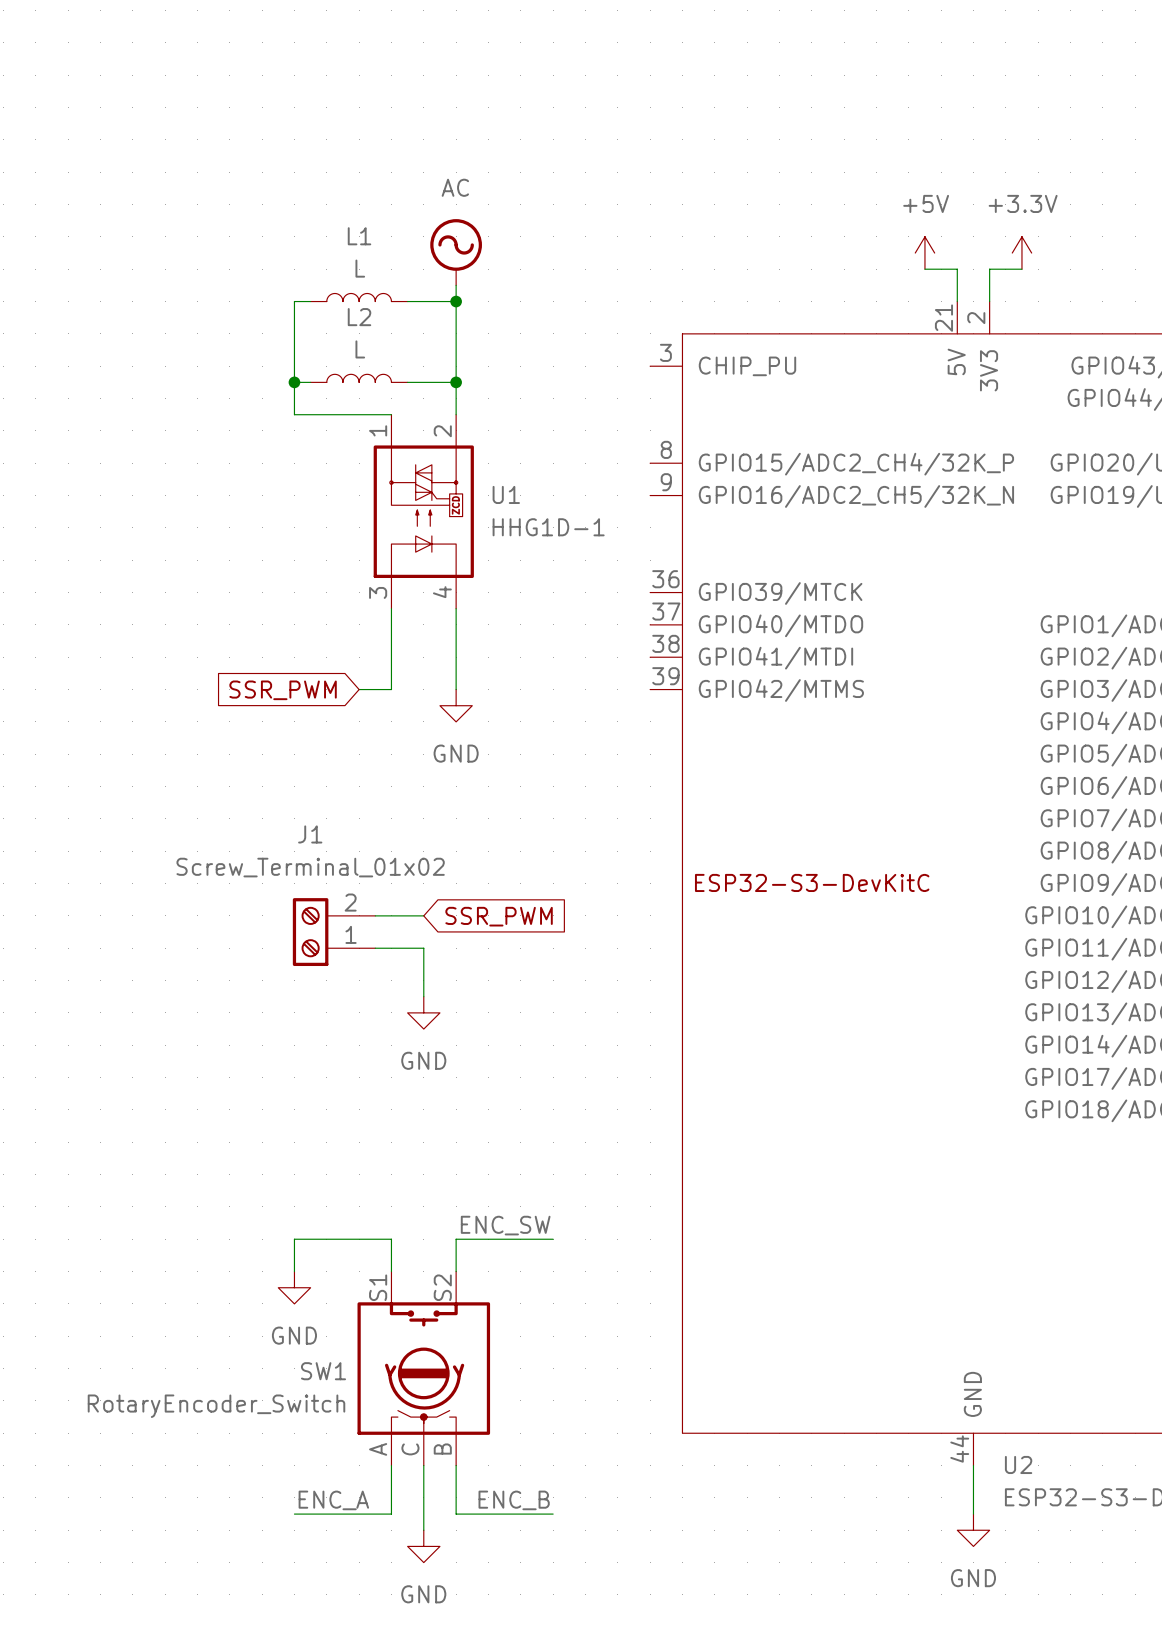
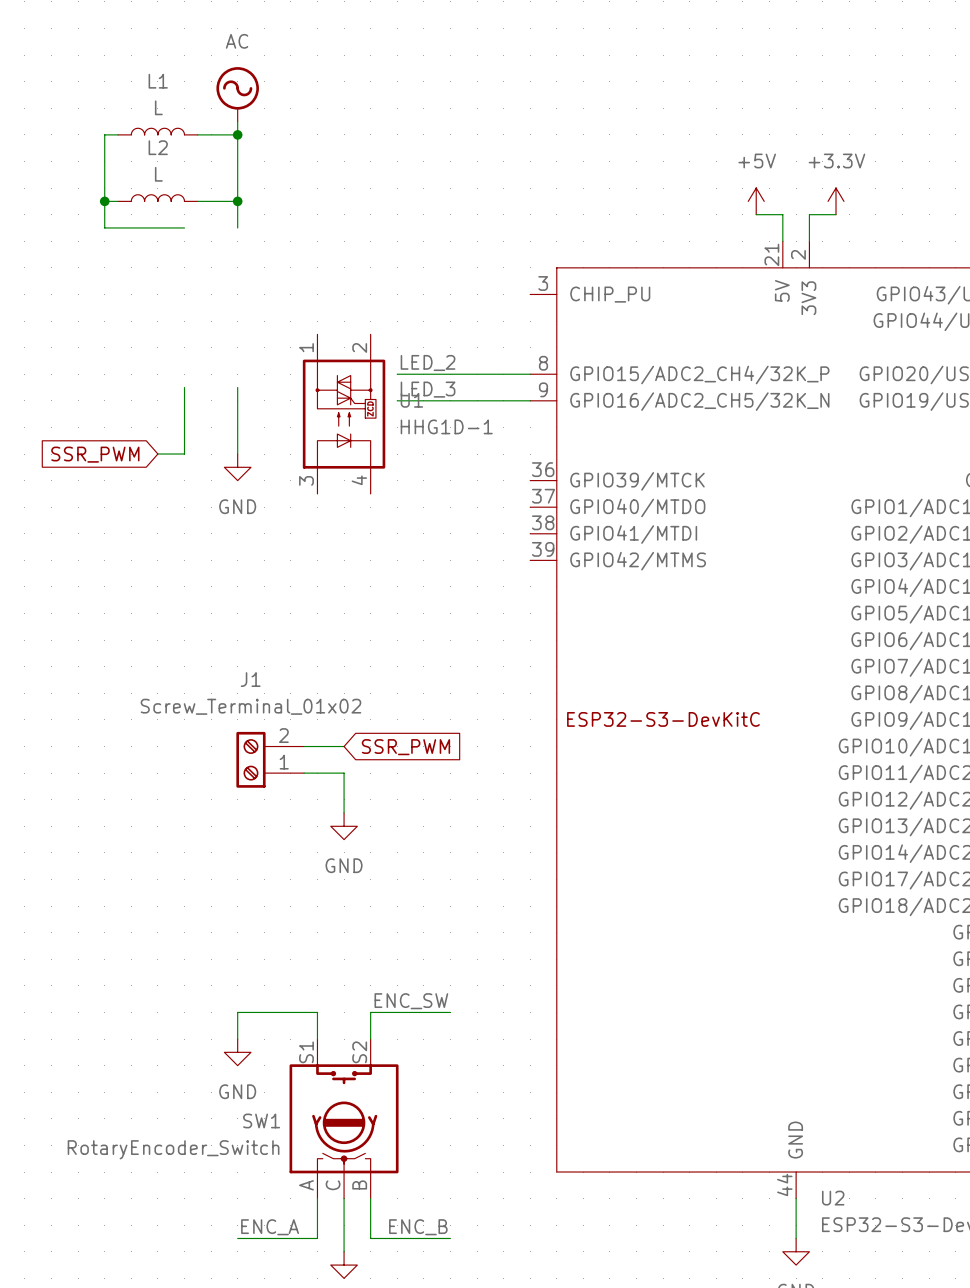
junction: none -> (237, 134)
power symbol position: AC (456, 252) -> AC (237, 94)
junction: none -> (104, 201)
junction: none -> (237, 201)
wire: (456, 285) (456, 414) -> (237, 121) (237, 227)
L1 position: (359, 297) -> (157, 131)
wire: (310, 301) (294, 301) (294, 414) (391, 414) -> (118, 134) (104, 134) (104, 227) (184, 227)
wire: (407, 301) (456, 301) -> (197, 134) (237, 134)
junction: (456, 301) -> none
L2 position: (359, 378) -> (157, 198)
wire: (294, 382) (310, 382) -> (104, 201) (118, 201)
junction: (294, 382) -> none
wire: (407, 382) (456, 382) -> (197, 201) (237, 201)
junction: (456, 382) -> none
label: none -> LED_2 (428, 363)
wire: none -> (397, 374) (530, 374)
label: none -> LED_3 (428, 389)
wire: none -> (397, 400) (530, 400)
wire: (391, 608) (391, 689) (359, 689) -> (184, 387) (184, 454) (157, 454)
wire: (456, 608) (456, 689) -> (237, 387) (237, 454)
global label position: SSR_PWM (283, 690) -> SSR_PWM (95, 454)
power symbol position: GND (456, 705) -> GND (237, 467)

